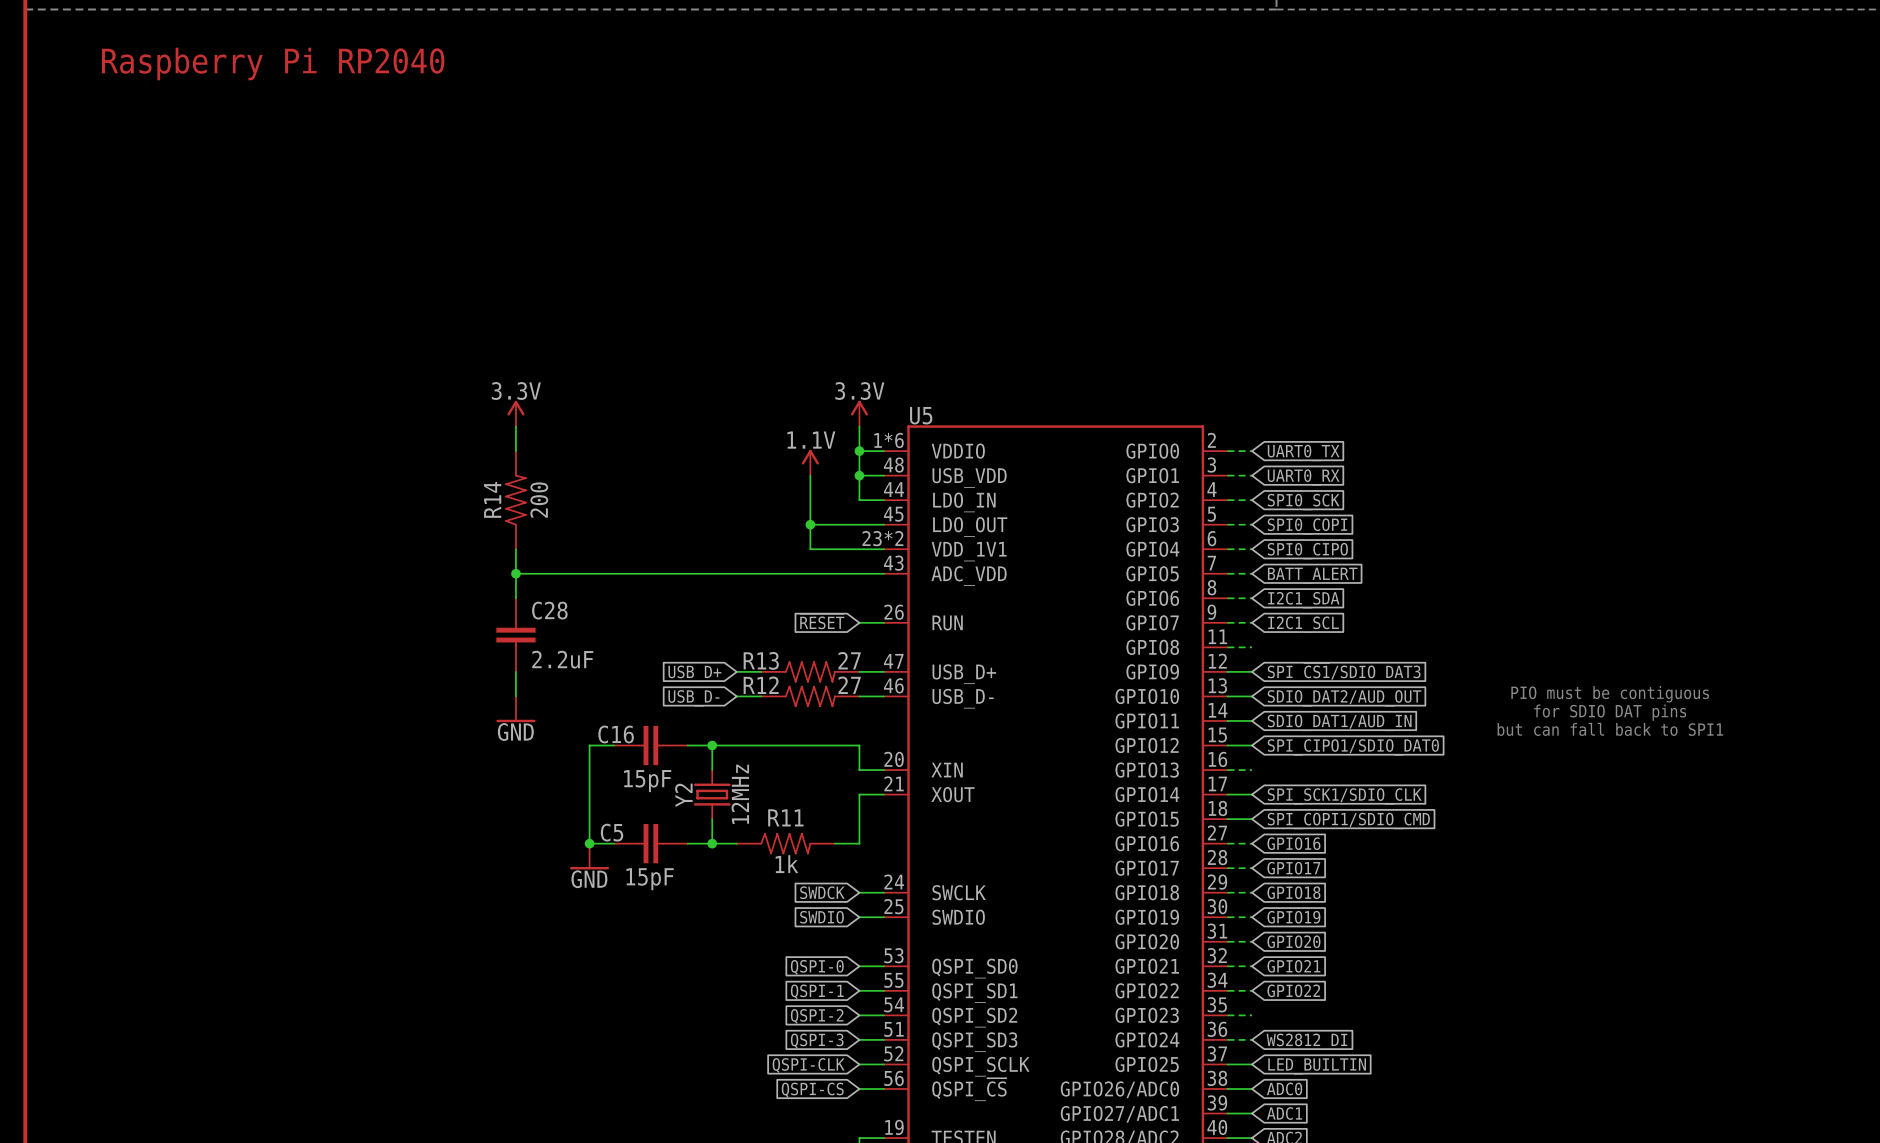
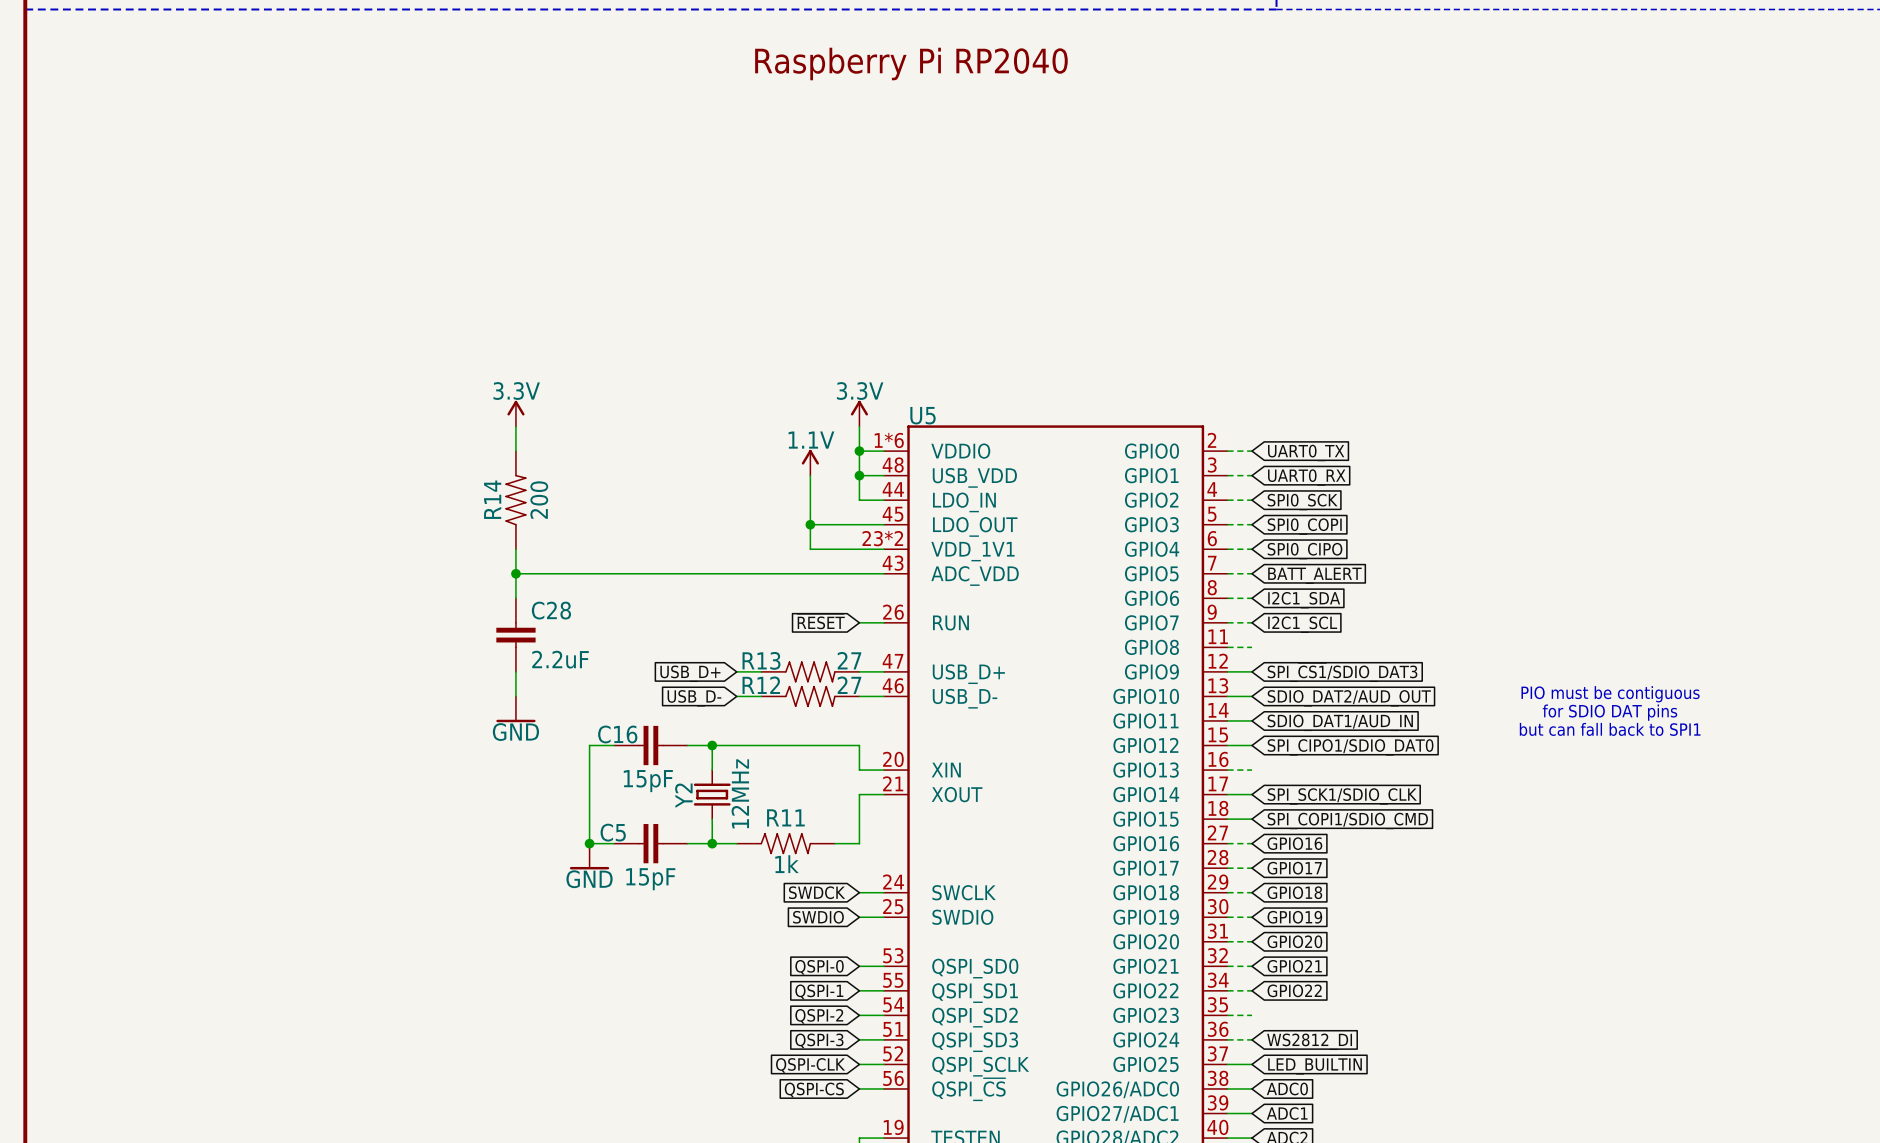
text: Raspberry Pi RP2040 (273, 63) -> none
text: none -> Raspberry Pi RP2040 (911, 63)

